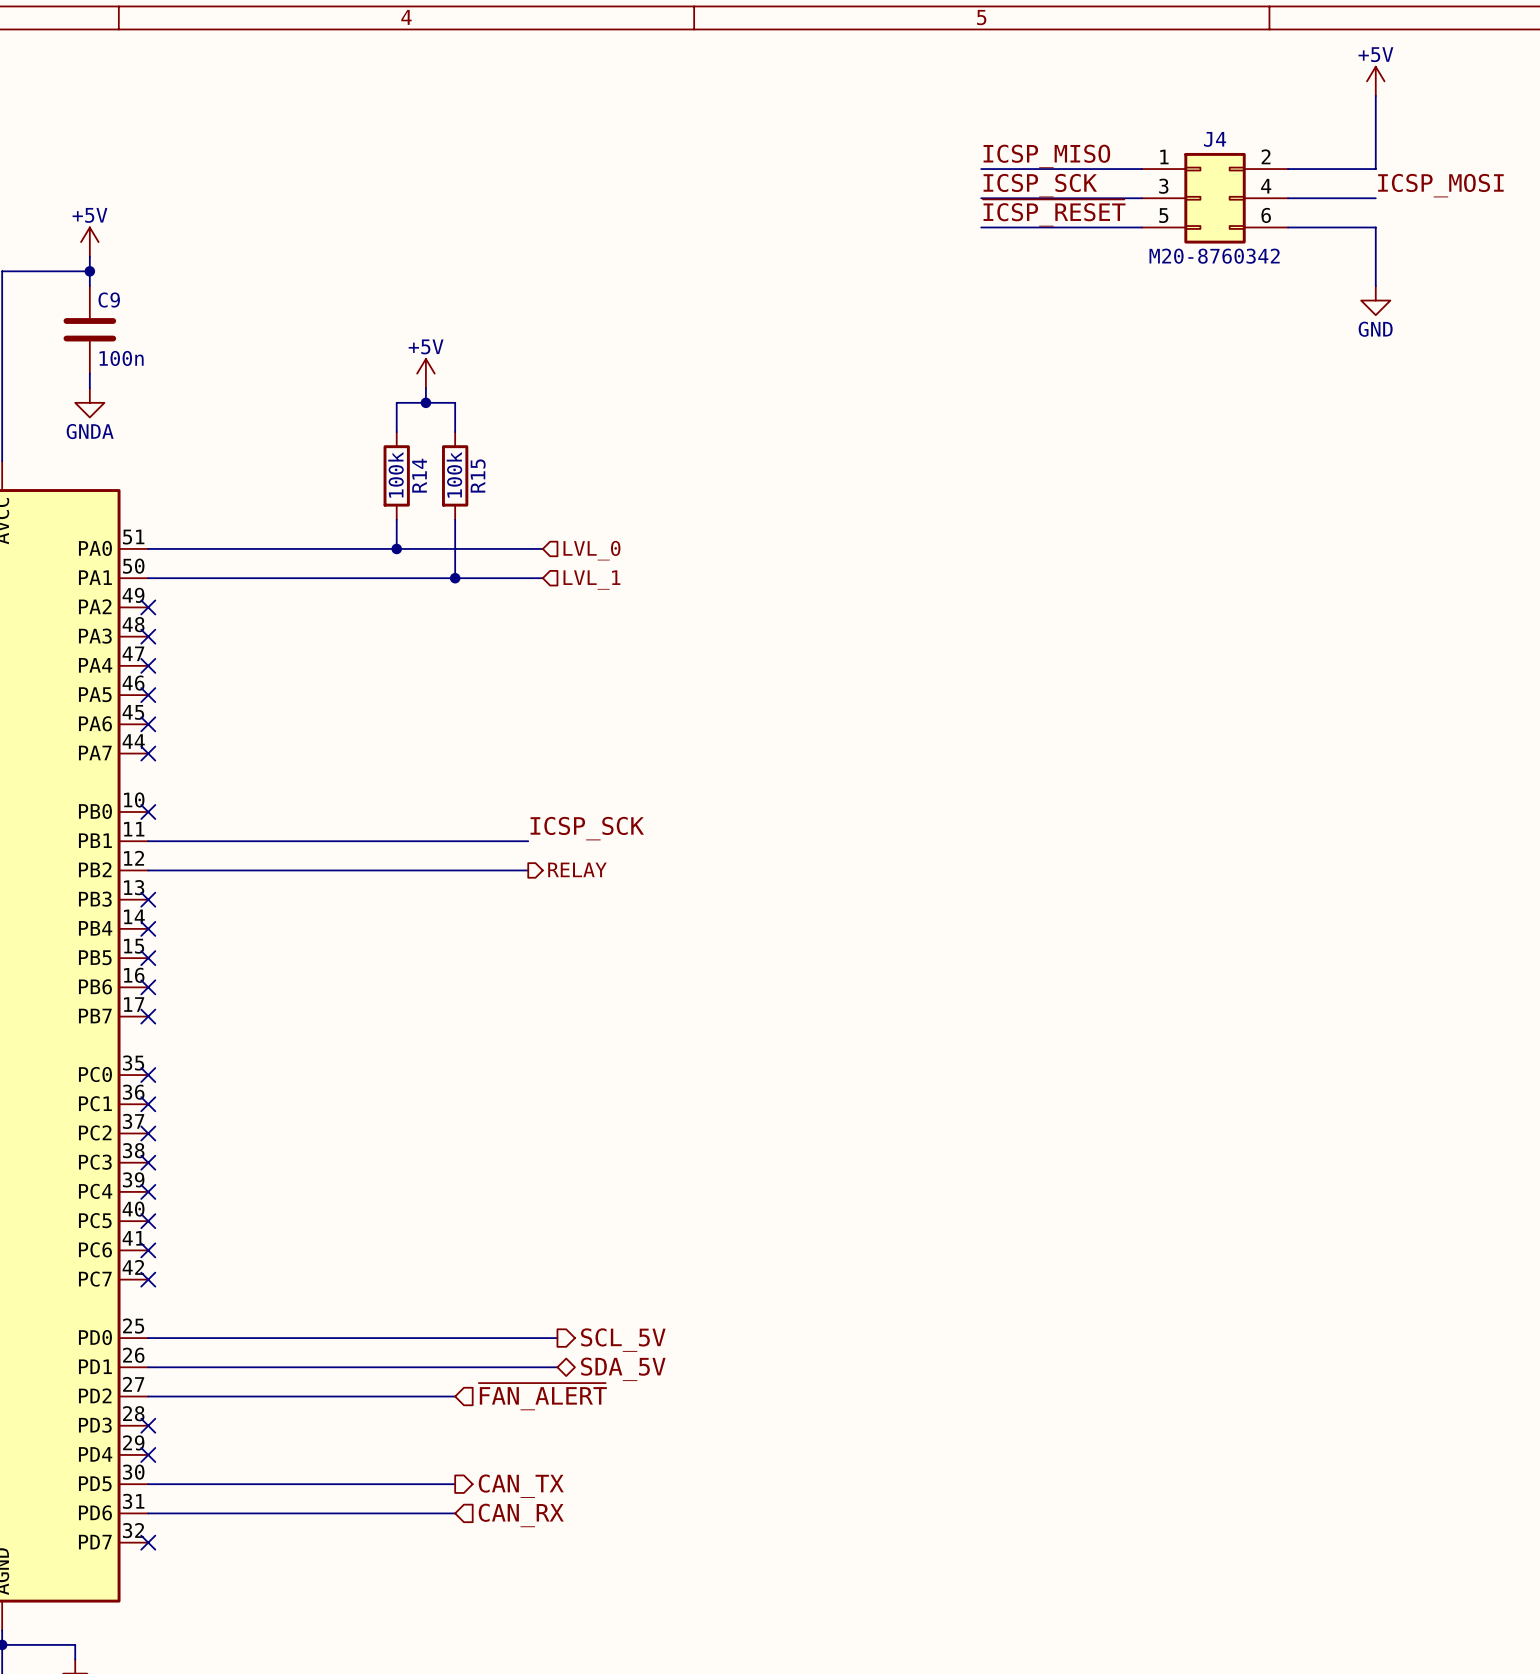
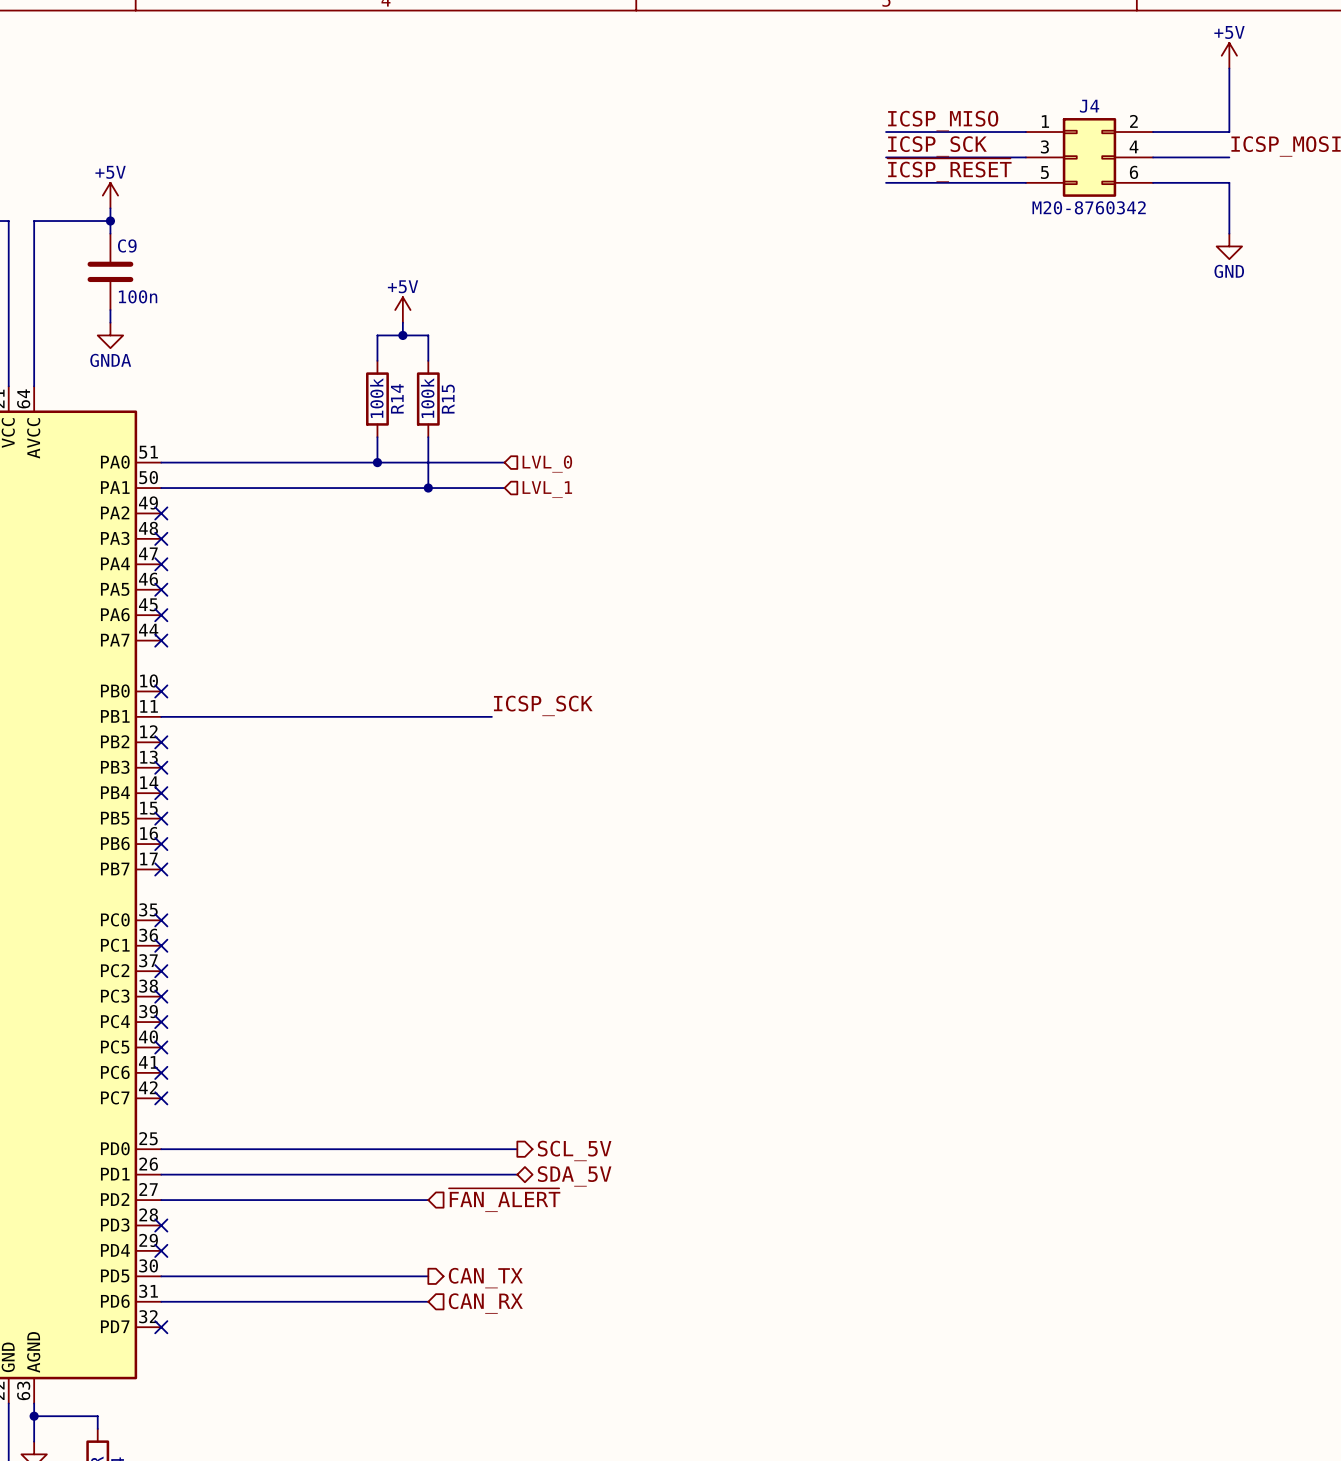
hierarchical label: RELAY (577, 869) -> none
wire: (148, 870) (528, 870) -> none
no-connect mark: none -> (161, 742)

